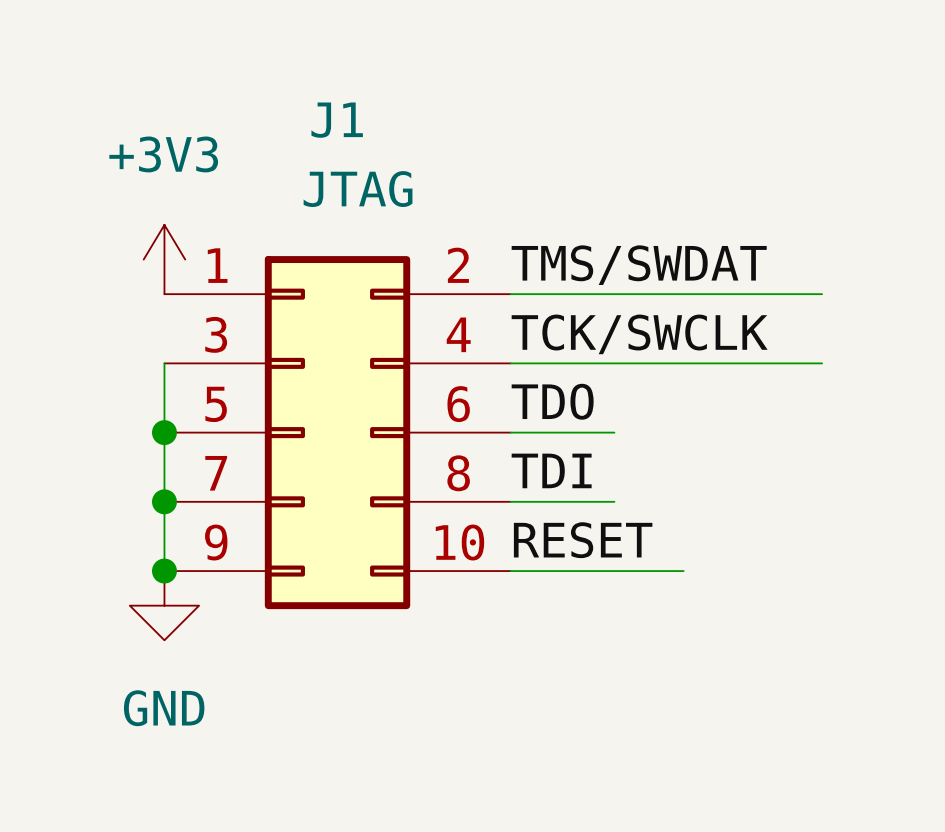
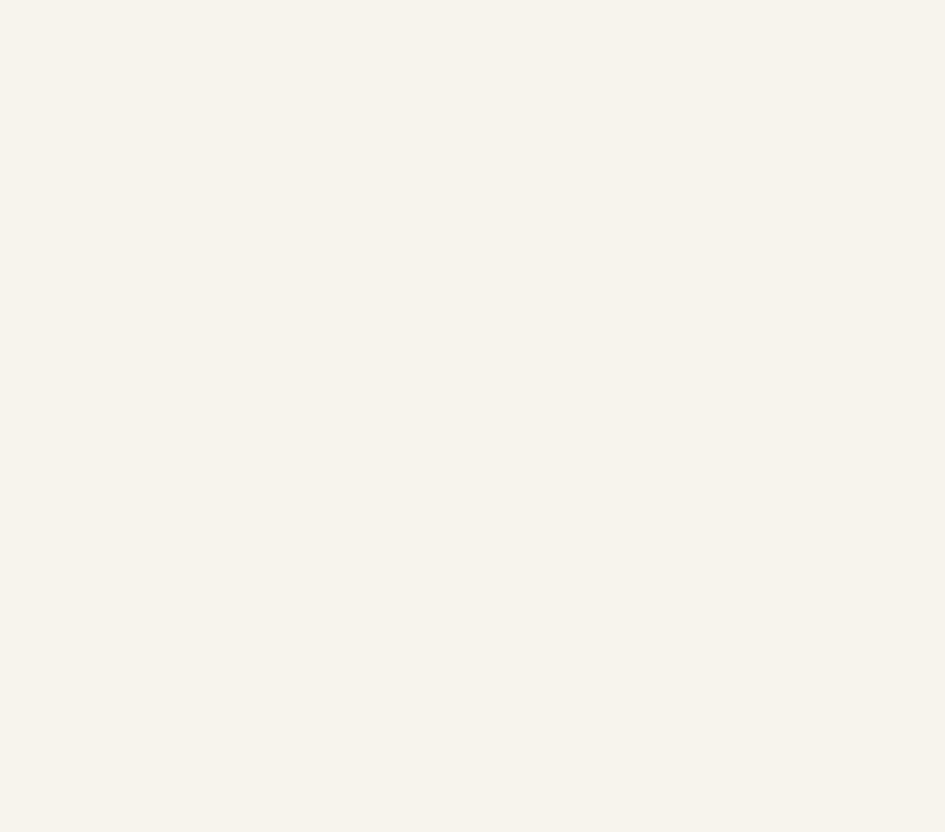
power symbol: +3V3 (164, 259) -> none
label: TMS/SWDAT (639, 265) -> none
wire: (510, 294) (822, 294) -> none
label: TCK/SWCLK (639, 334) -> none
wire: (164, 363) (164, 571) -> none
wire: (510, 363) (822, 363) -> none
label: TDO (552, 401) -> none
junction: (164, 432) -> none
J1: JTAG (337, 432) -> none
wire: (510, 432) (614, 432) -> none
label: TDI (551, 470) -> none
junction: (164, 501) -> none
wire: (510, 501) (614, 501) -> none
label: RESET (583, 540) -> none
junction: (164, 571) -> none
wire: (510, 571) (683, 571) -> none
power symbol: GND (164, 605) -> none

